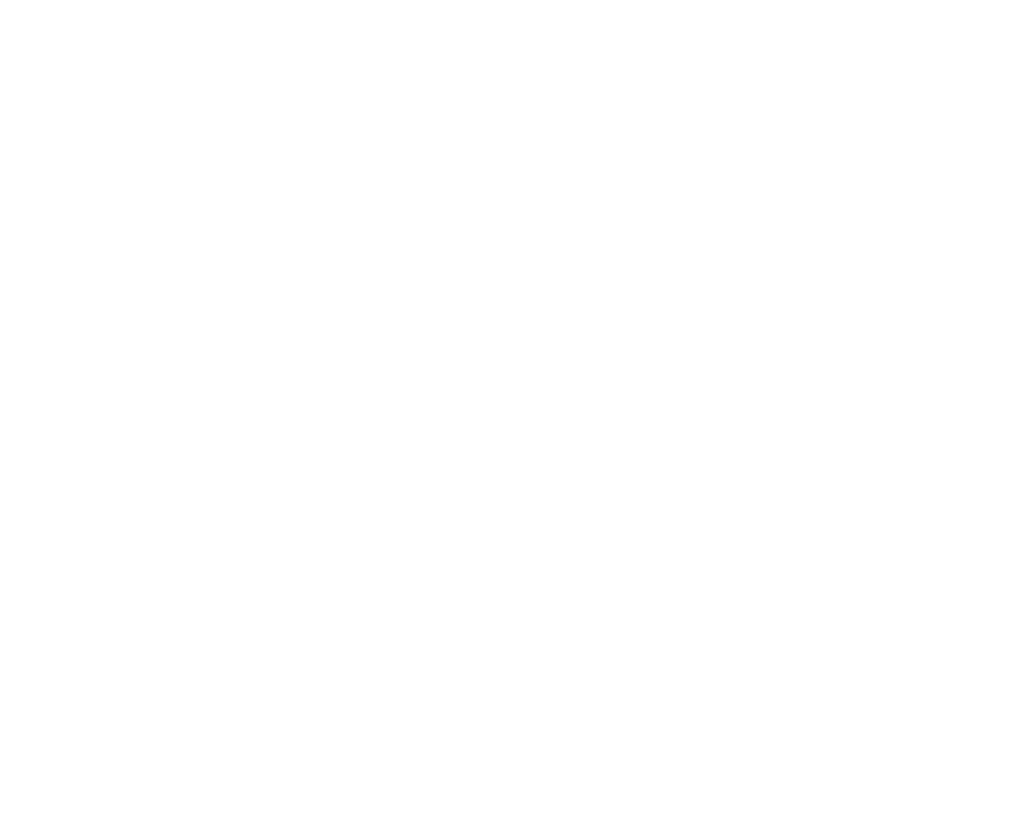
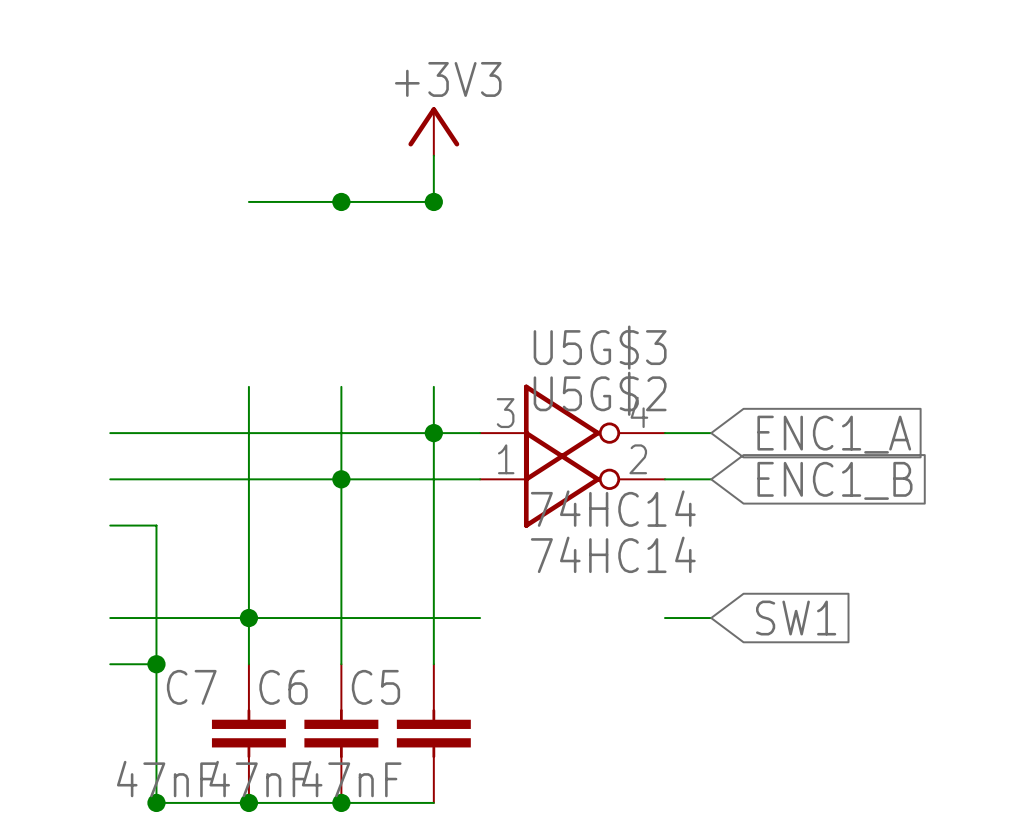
power symbol: none -> +3V3 (433, 131)
wire: none -> (433, 155) (433, 201) (248, 201)
junction: none -> (341, 201)
junction: none -> (433, 201)
wire: none -> (248, 386) (248, 664)
wire: none -> (341, 386) (341, 664)
wire: none -> (433, 386) (433, 664)
wire: none -> (110, 433) (480, 433)
junction: none -> (433, 433)
U5G$3: none -> 74HC14 (572, 433)
wire: none -> (664, 433) (711, 433)
global label: none -> ENC1_A (834, 434)
wire: none -> (110, 479) (480, 479)
junction: none -> (341, 479)
U5G$2: none -> 74HC14 (572, 479)
wire: none -> (664, 479) (711, 479)
global label: none -> ENC1_B (834, 480)
wire: none -> (110, 525) (156, 525) (156, 802) (433, 802)
wire: none -> (110, 618) (480, 618)
junction: none -> (248, 618)
wire: none -> (664, 618) (711, 618)
global label: none -> SW1 (796, 618)
wire: none -> (110, 664) (156, 664)
junction: none -> (156, 664)
C7: none -> 47nF (248, 733)
C6: none -> 47nF (341, 733)
C5: none -> 47nF (433, 733)
junction: none -> (156, 802)
junction: none -> (248, 802)
junction: none -> (341, 802)

